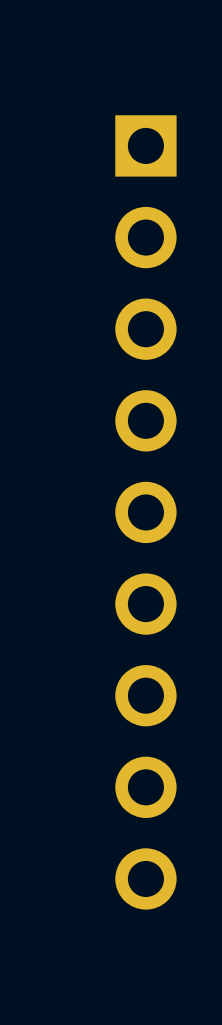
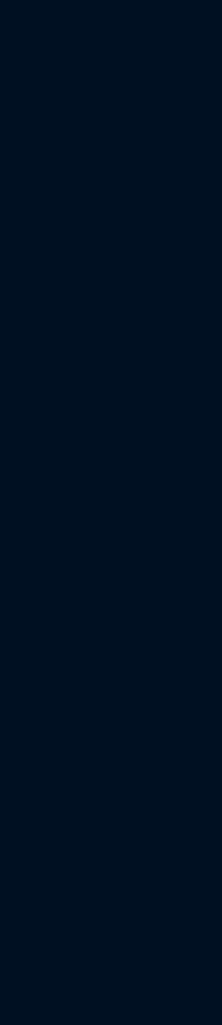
part: (145, 512) -> none

